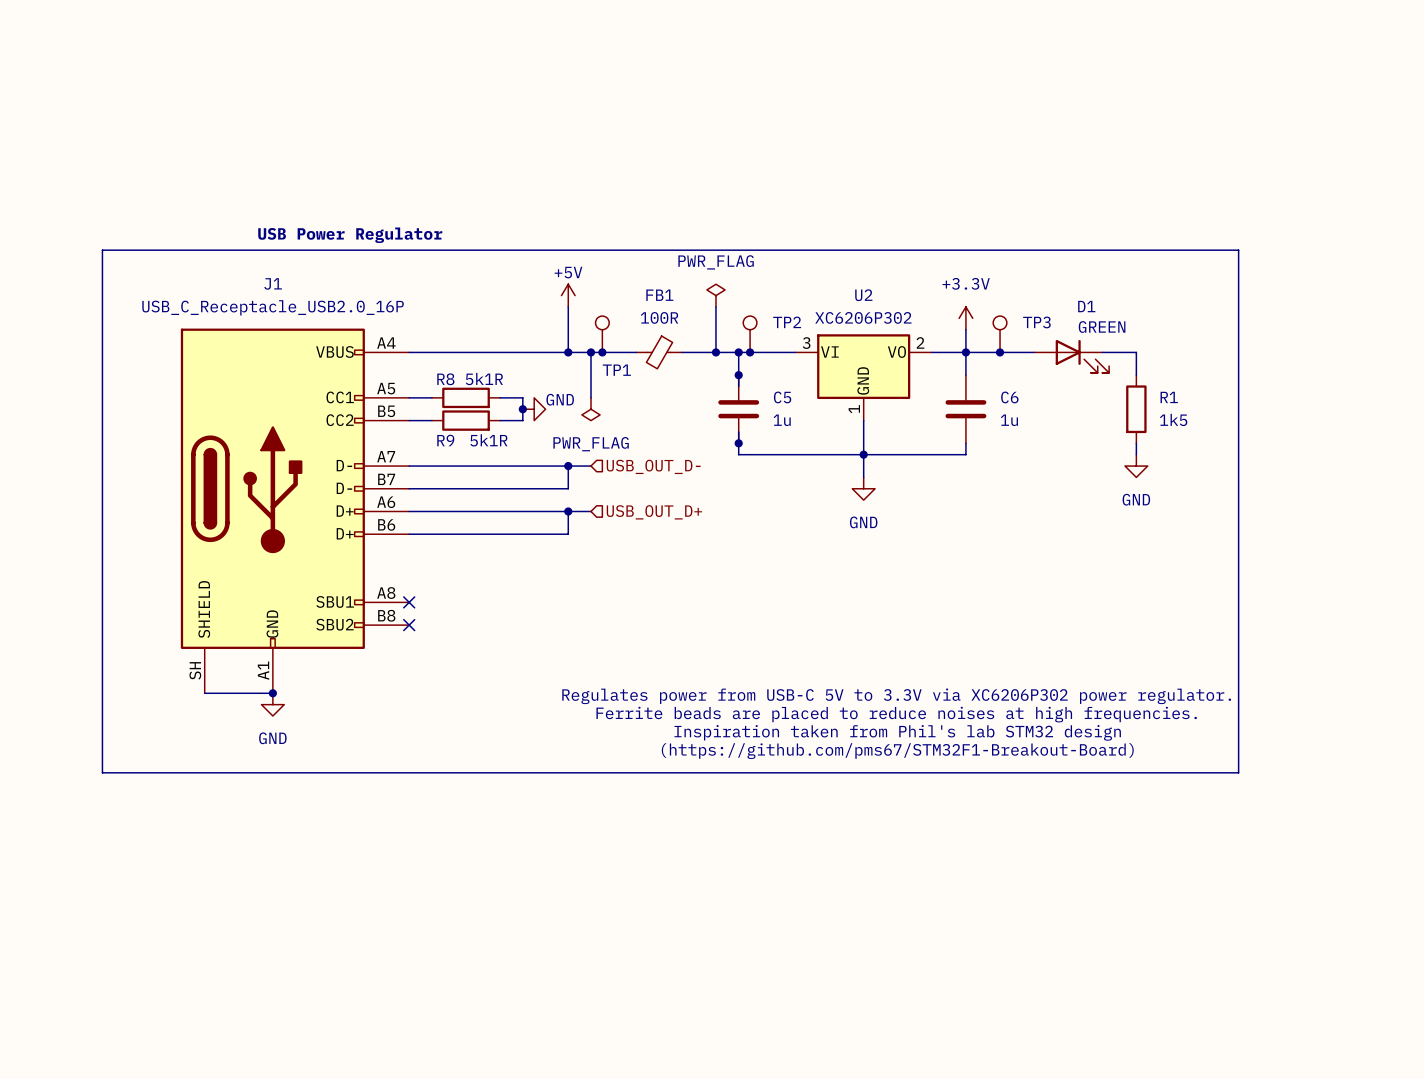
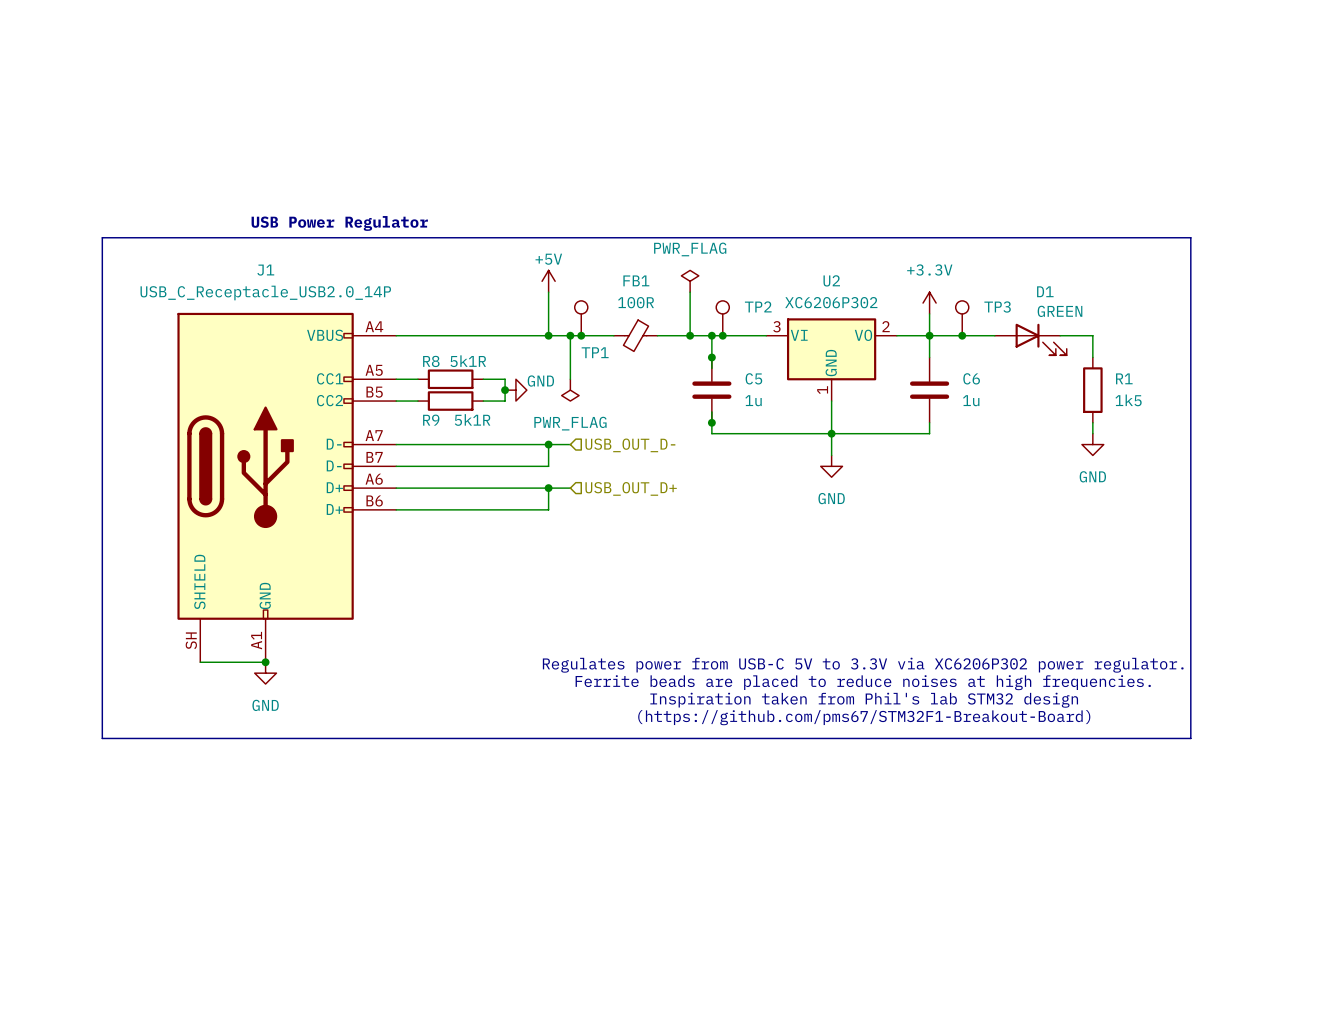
J1 value: USB_C_Receptacle_USB2.0_16P (273, 307) -> USB_C_Receptacle_USB2.0_14P (265, 293)
J1 symbol: [180, 328, 410, 694] -> [177, 312, 397, 663]
no-connect mark: (409, 602) -> none
no-connect mark: (409, 625) -> none

